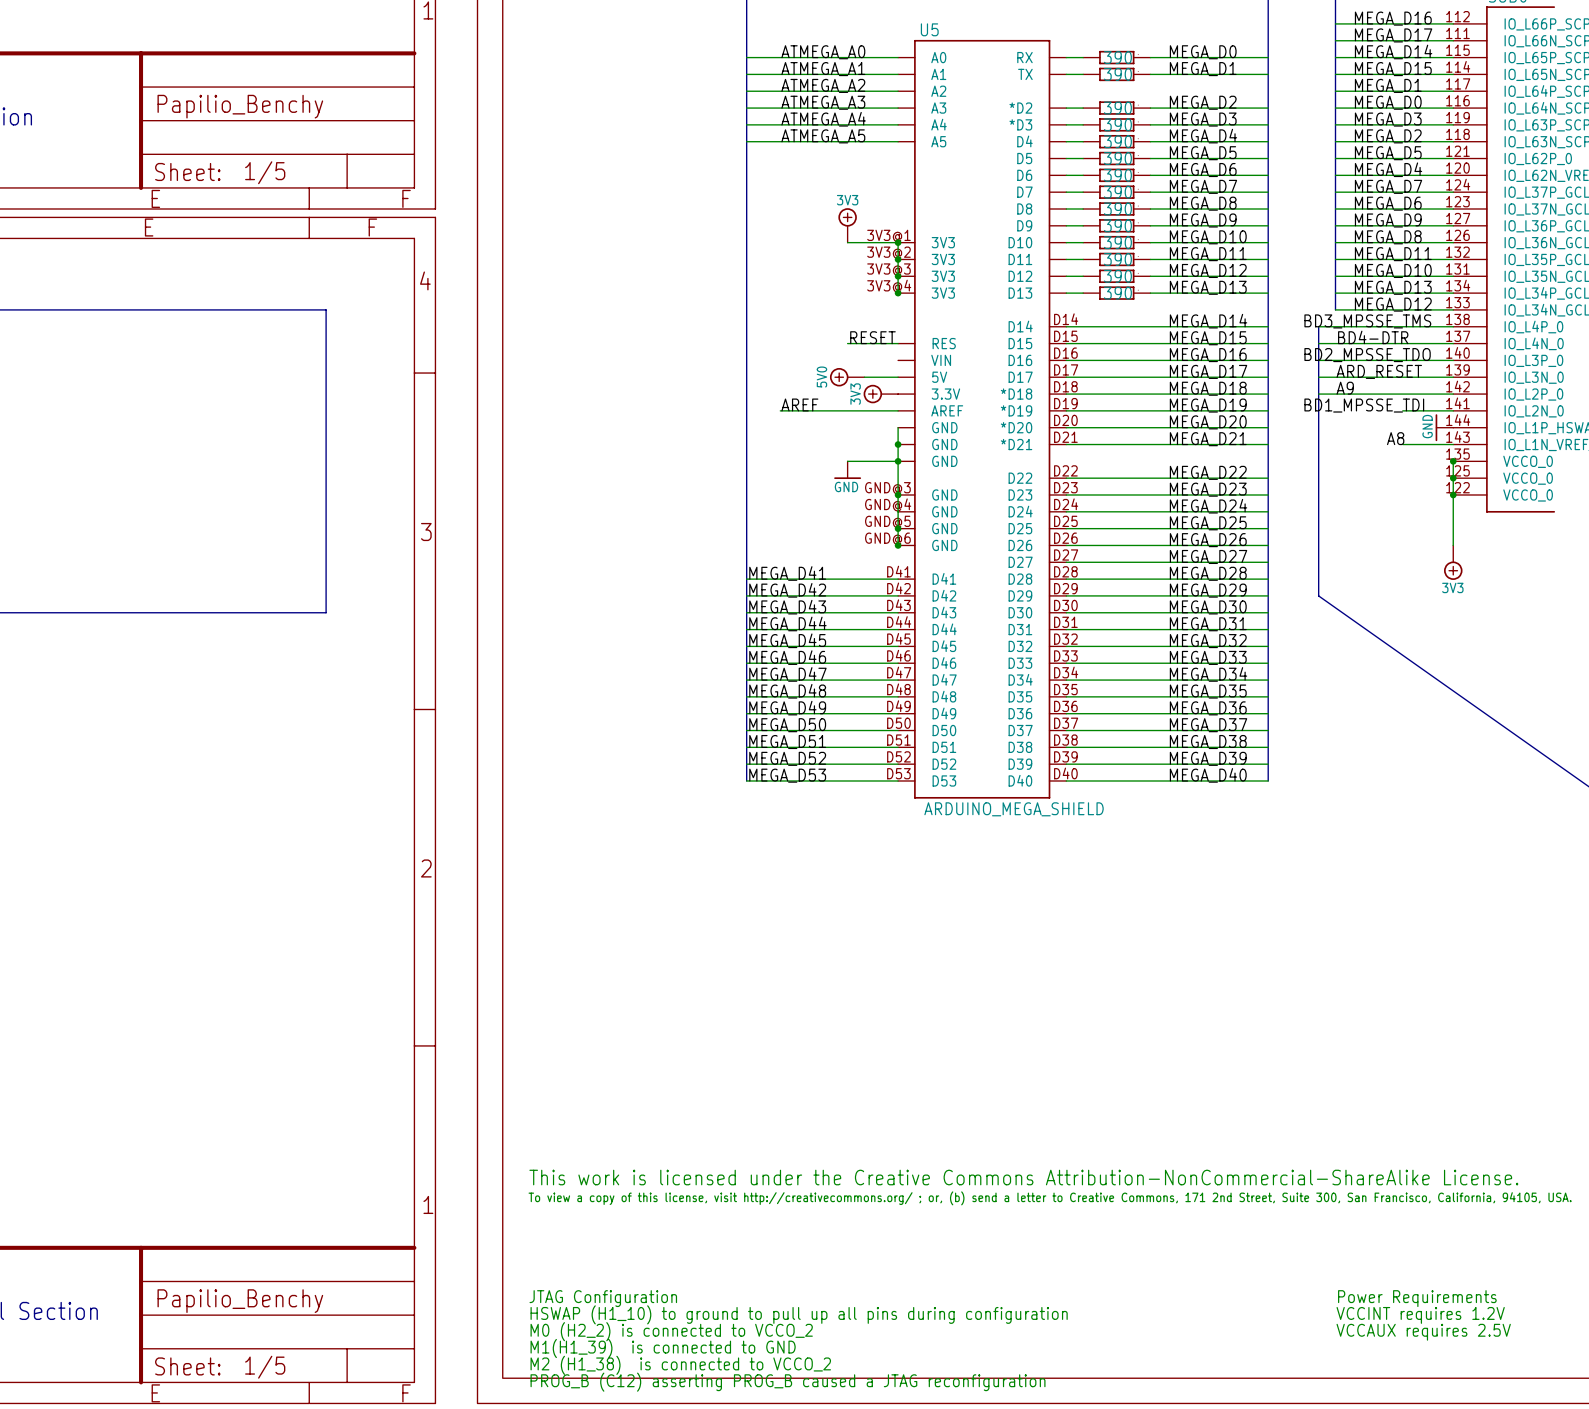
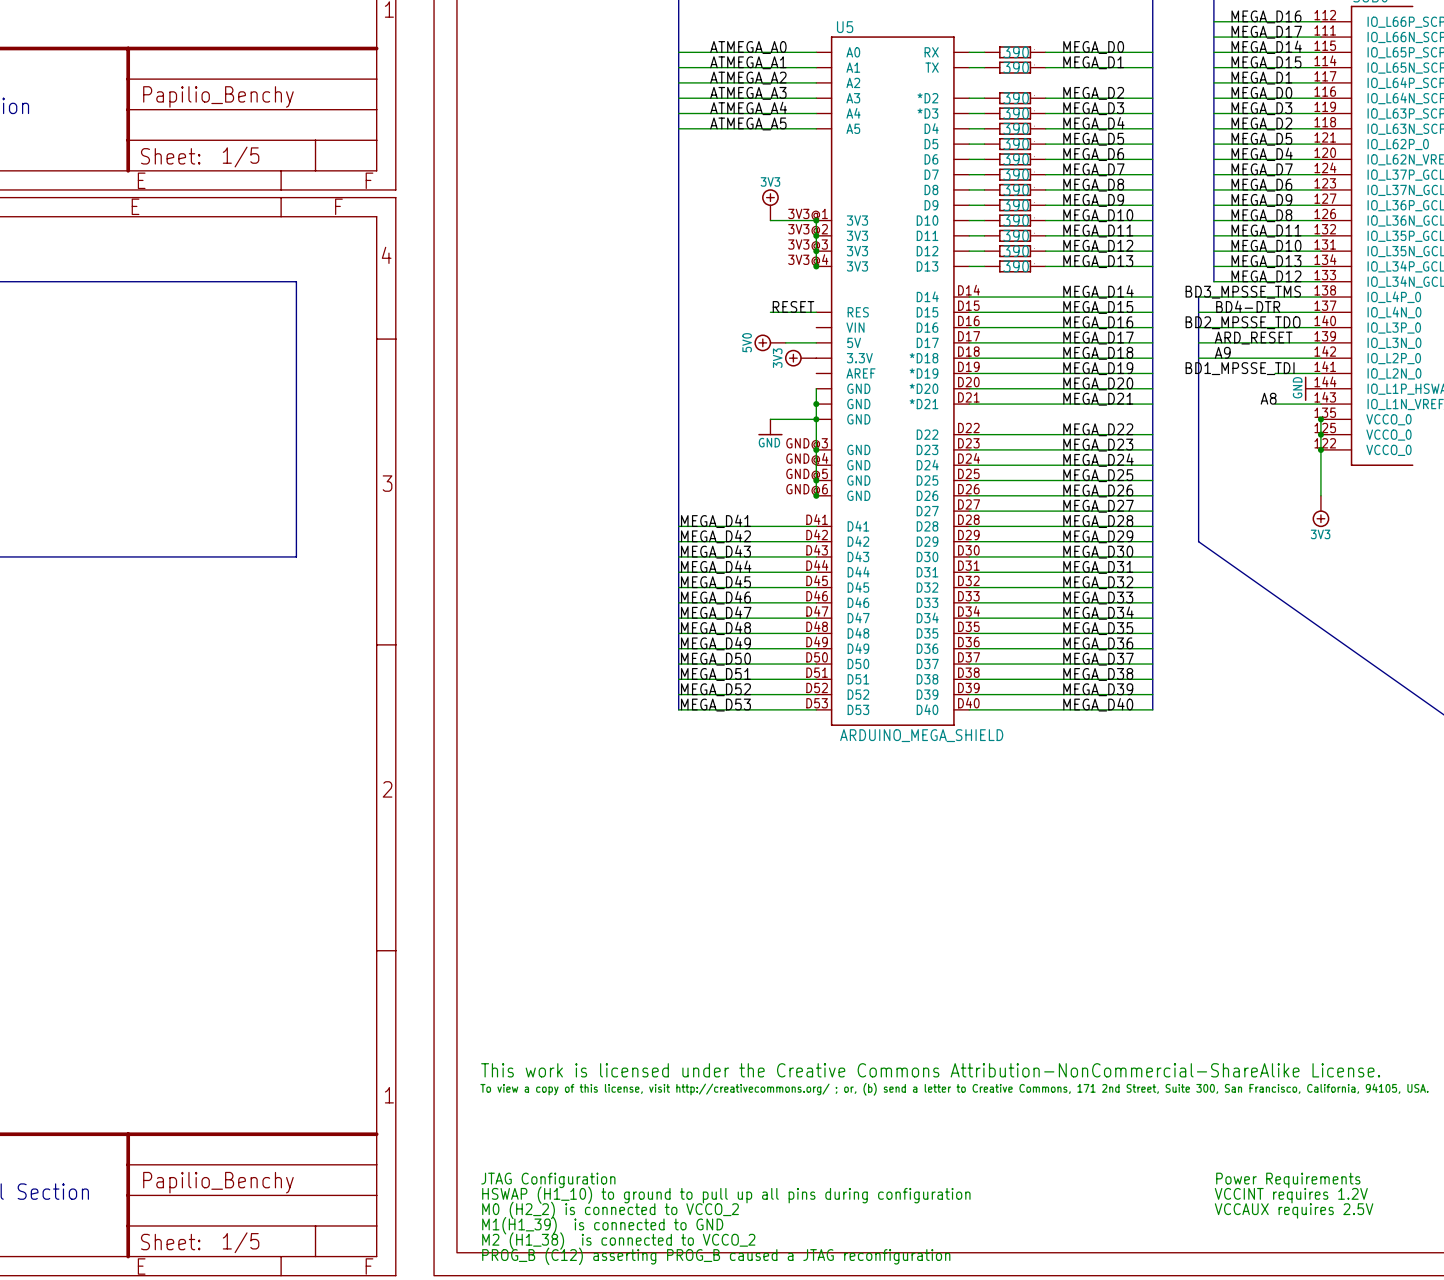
label: AREF (799, 404) -> none
wire: (780, 410) (898, 410) -> none

